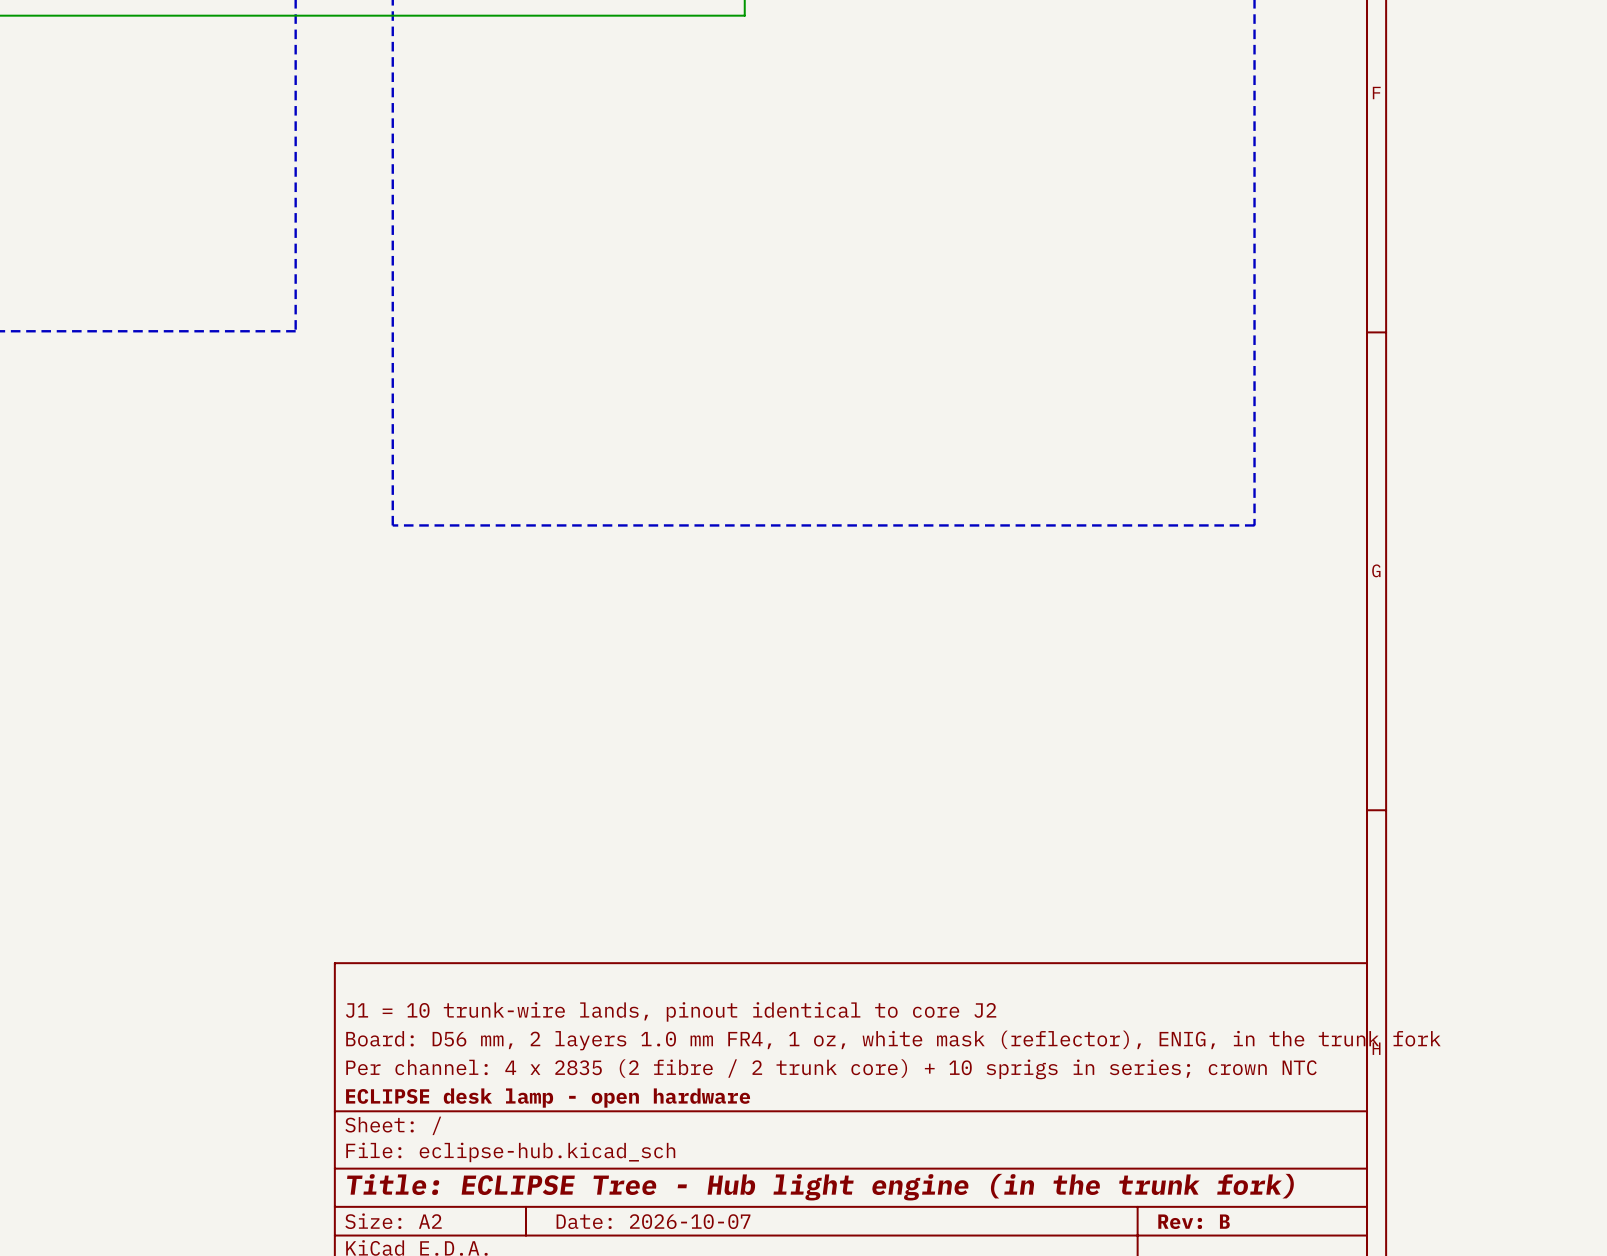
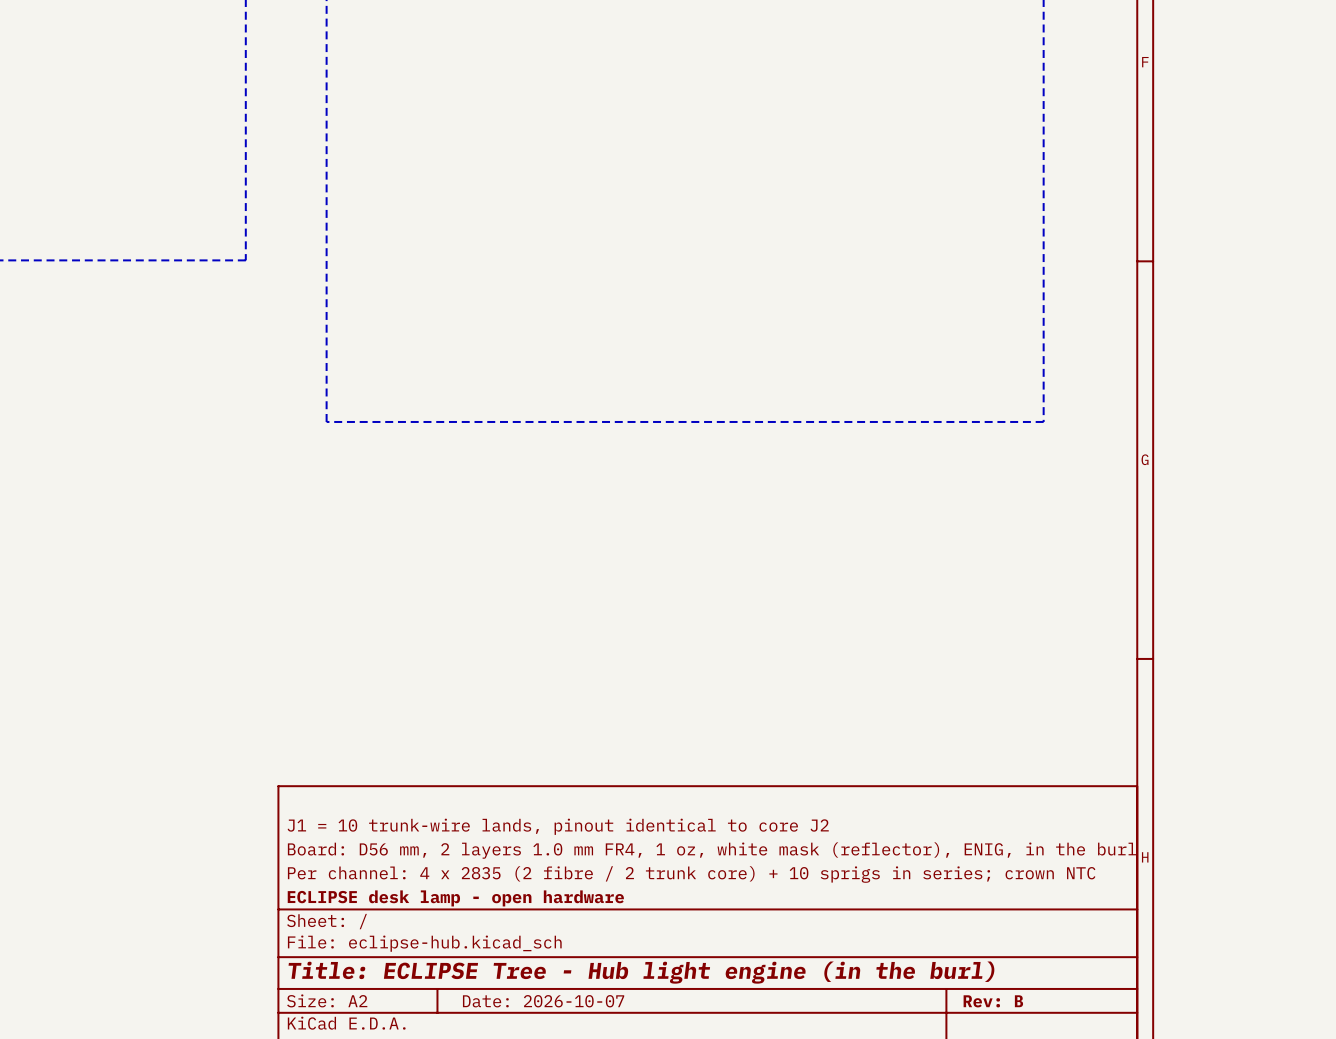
title block: Board: D56 mm, 2 layers 1.0 mm FR4, 1 oz, white mask (reflector), ENIG, in the trunk fork (893, 1040) -> Board: D56 mm, 2 layers 1.0 mm FR4, 1 oz, white mask (reflector), ENIG, in the burl (711, 850)
title block: Title: ECLIPSE Tree - Hub light engine (in the trunk fork) (820, 1187) -> Title: ECLIPSE Tree - Hub light engine (in the burl) (641, 972)

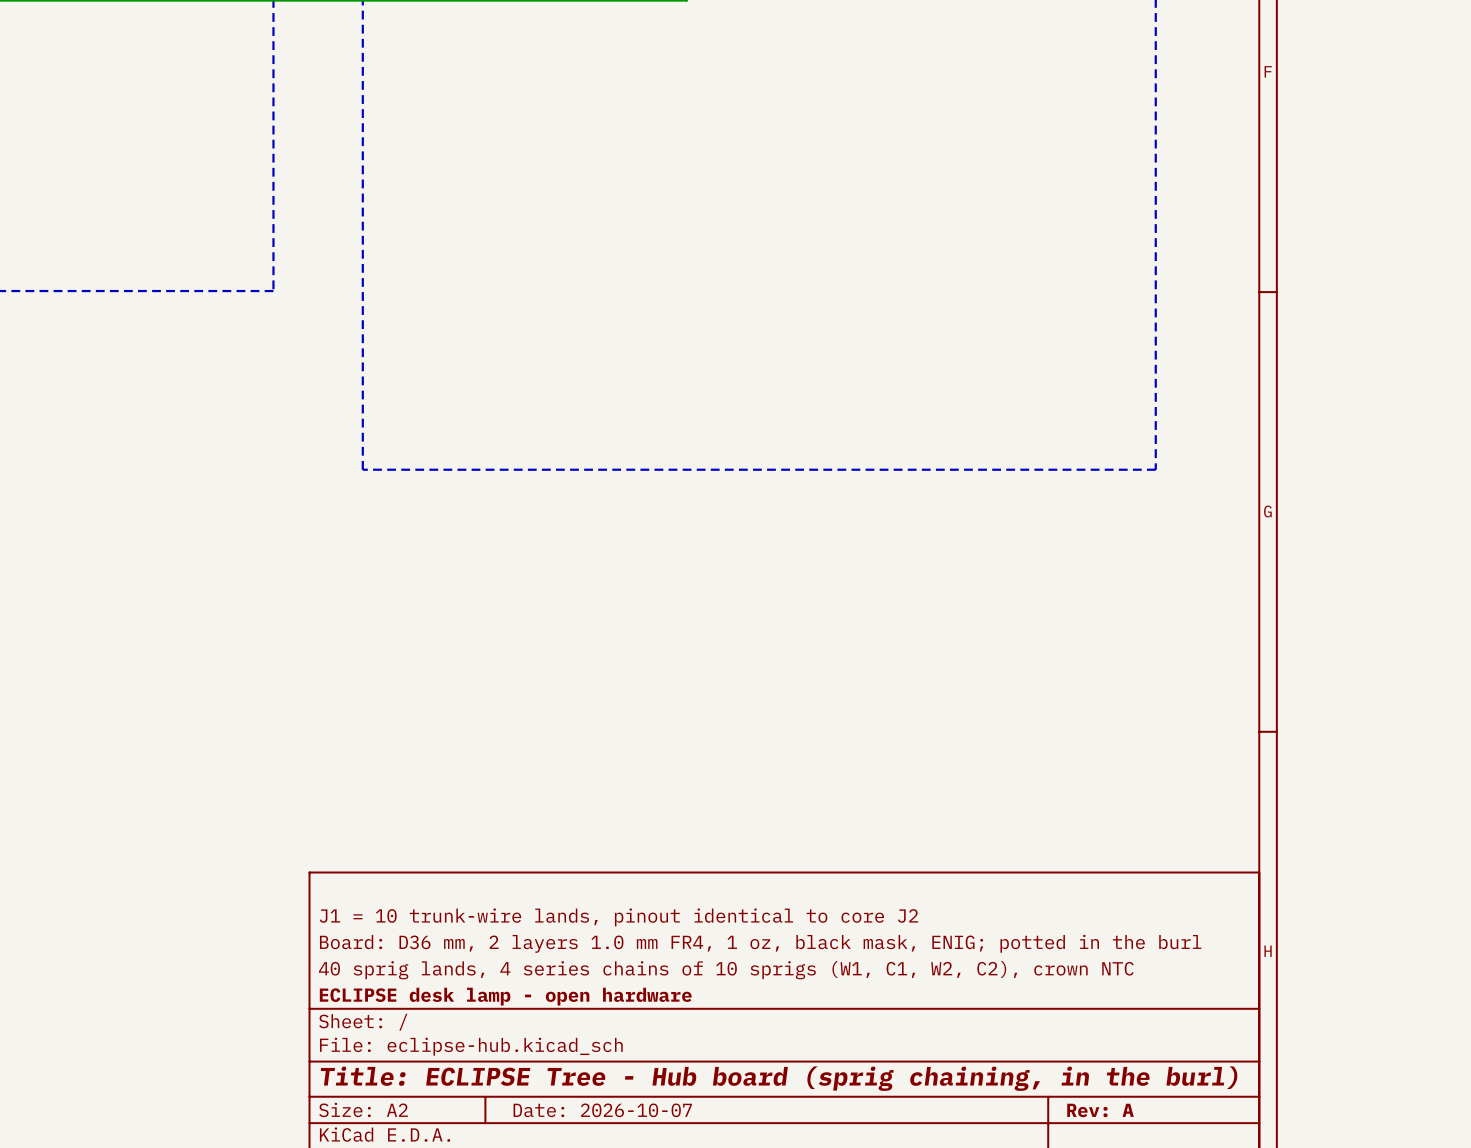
title block: Board: D56 mm, 2 layers 1.0 mm FR4, 1 oz, white mask (reflector), ENIG, in the burl (711, 850) -> Board: D36 mm, 2 layers 1.0 mm FR4, 1 oz, black mask, ENIG; potted in the burl (760, 943)
title block: Per channel: 4 x 2835 (2 fibre / 2 trunk core) + 10 sprigs in series; crown NTC (691, 874) -> 40 sprig lands, 4 series chains of 10 sprigs (W1, C1, W2, C2), crown NTC (726, 970)
title block: Title: ECLIPSE Tree - Hub light engine (in the burl) (641, 972) -> Title: ECLIPSE Tree - Hub board (sprig chaining, in the burl) (779, 1078)
title block: Rev: B (993, 1001) -> Rev: A (1100, 1110)

